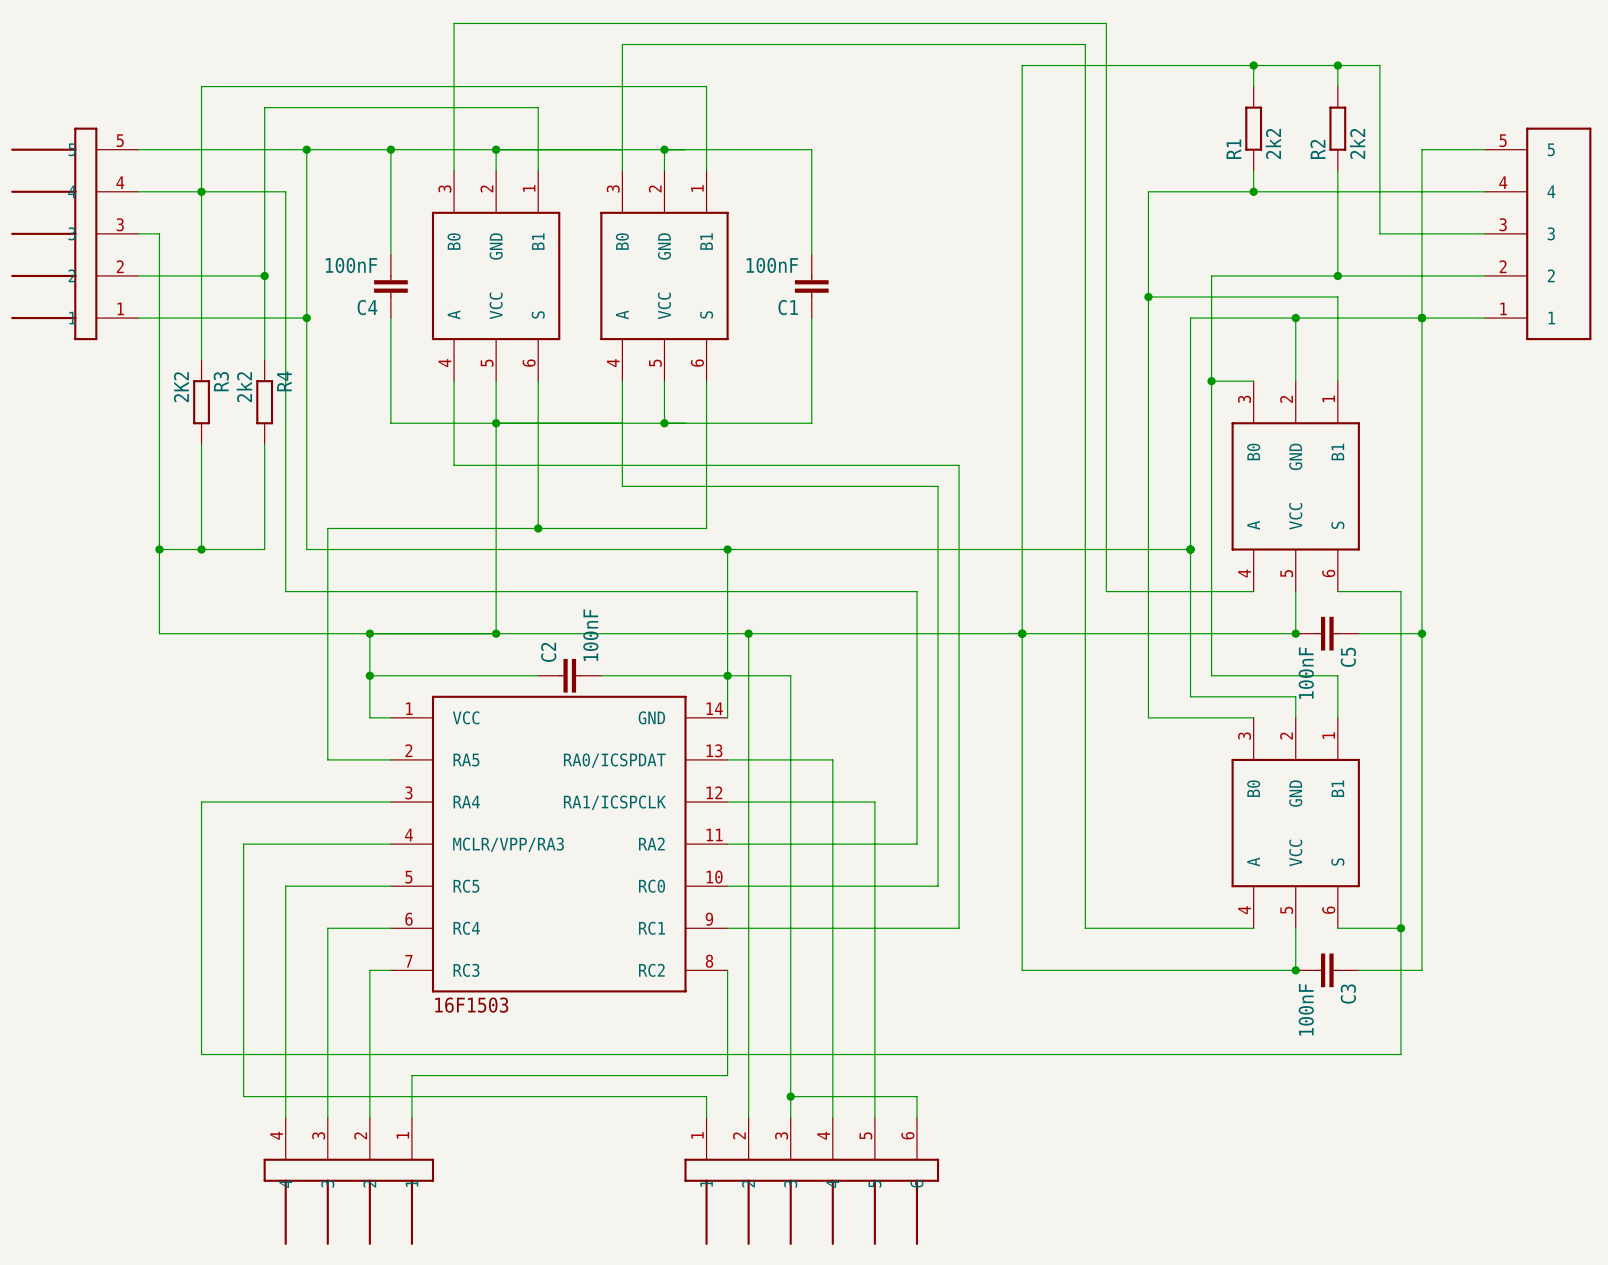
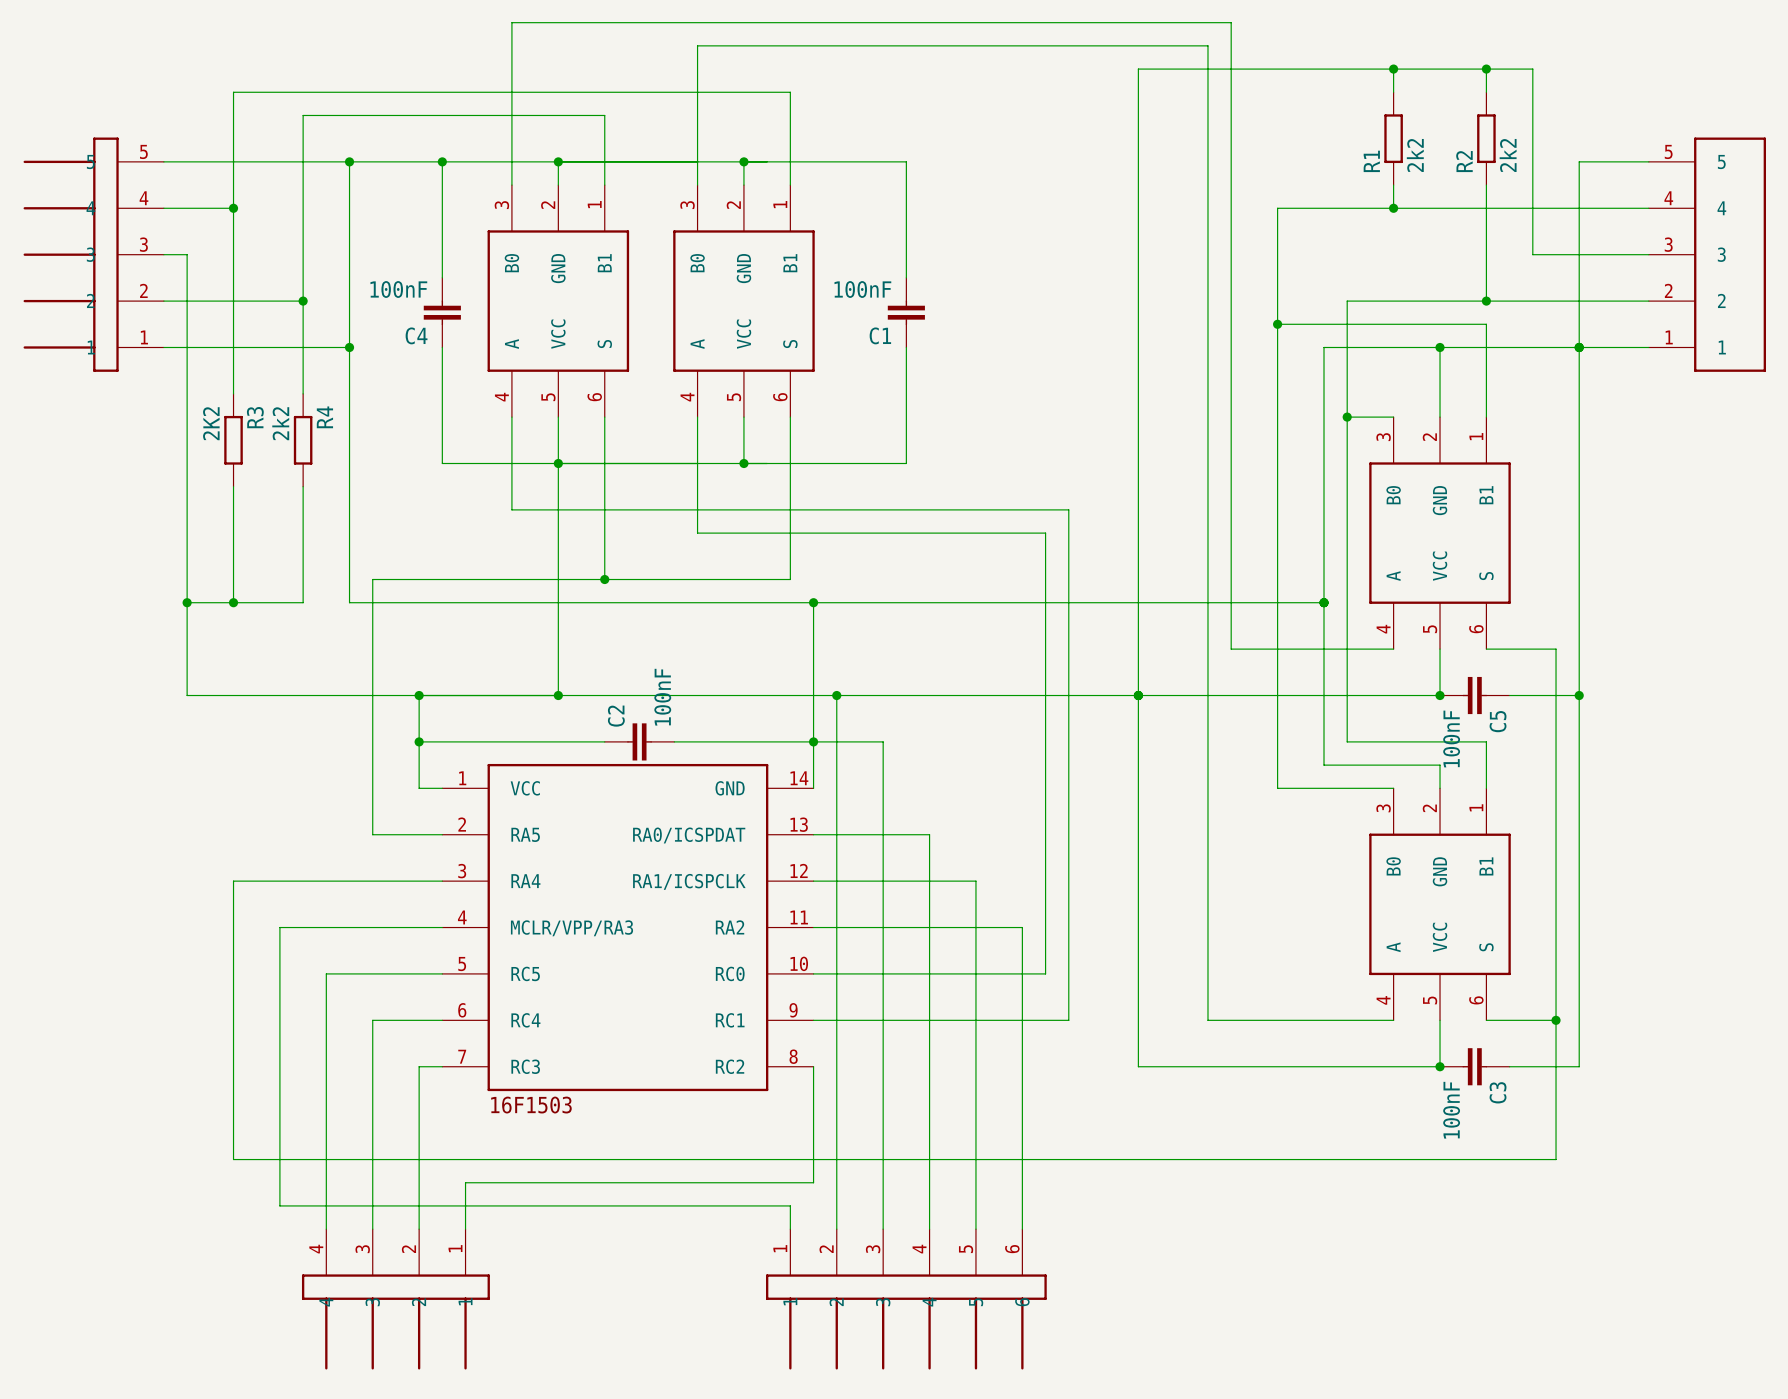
wire: (201, 191) (285, 191) (285, 591) (916, 591) (916, 844) -> none
wire: (790, 1096) (916, 1096) -> (1022, 927) (1022, 1205)
junction: (790, 1096) -> none

